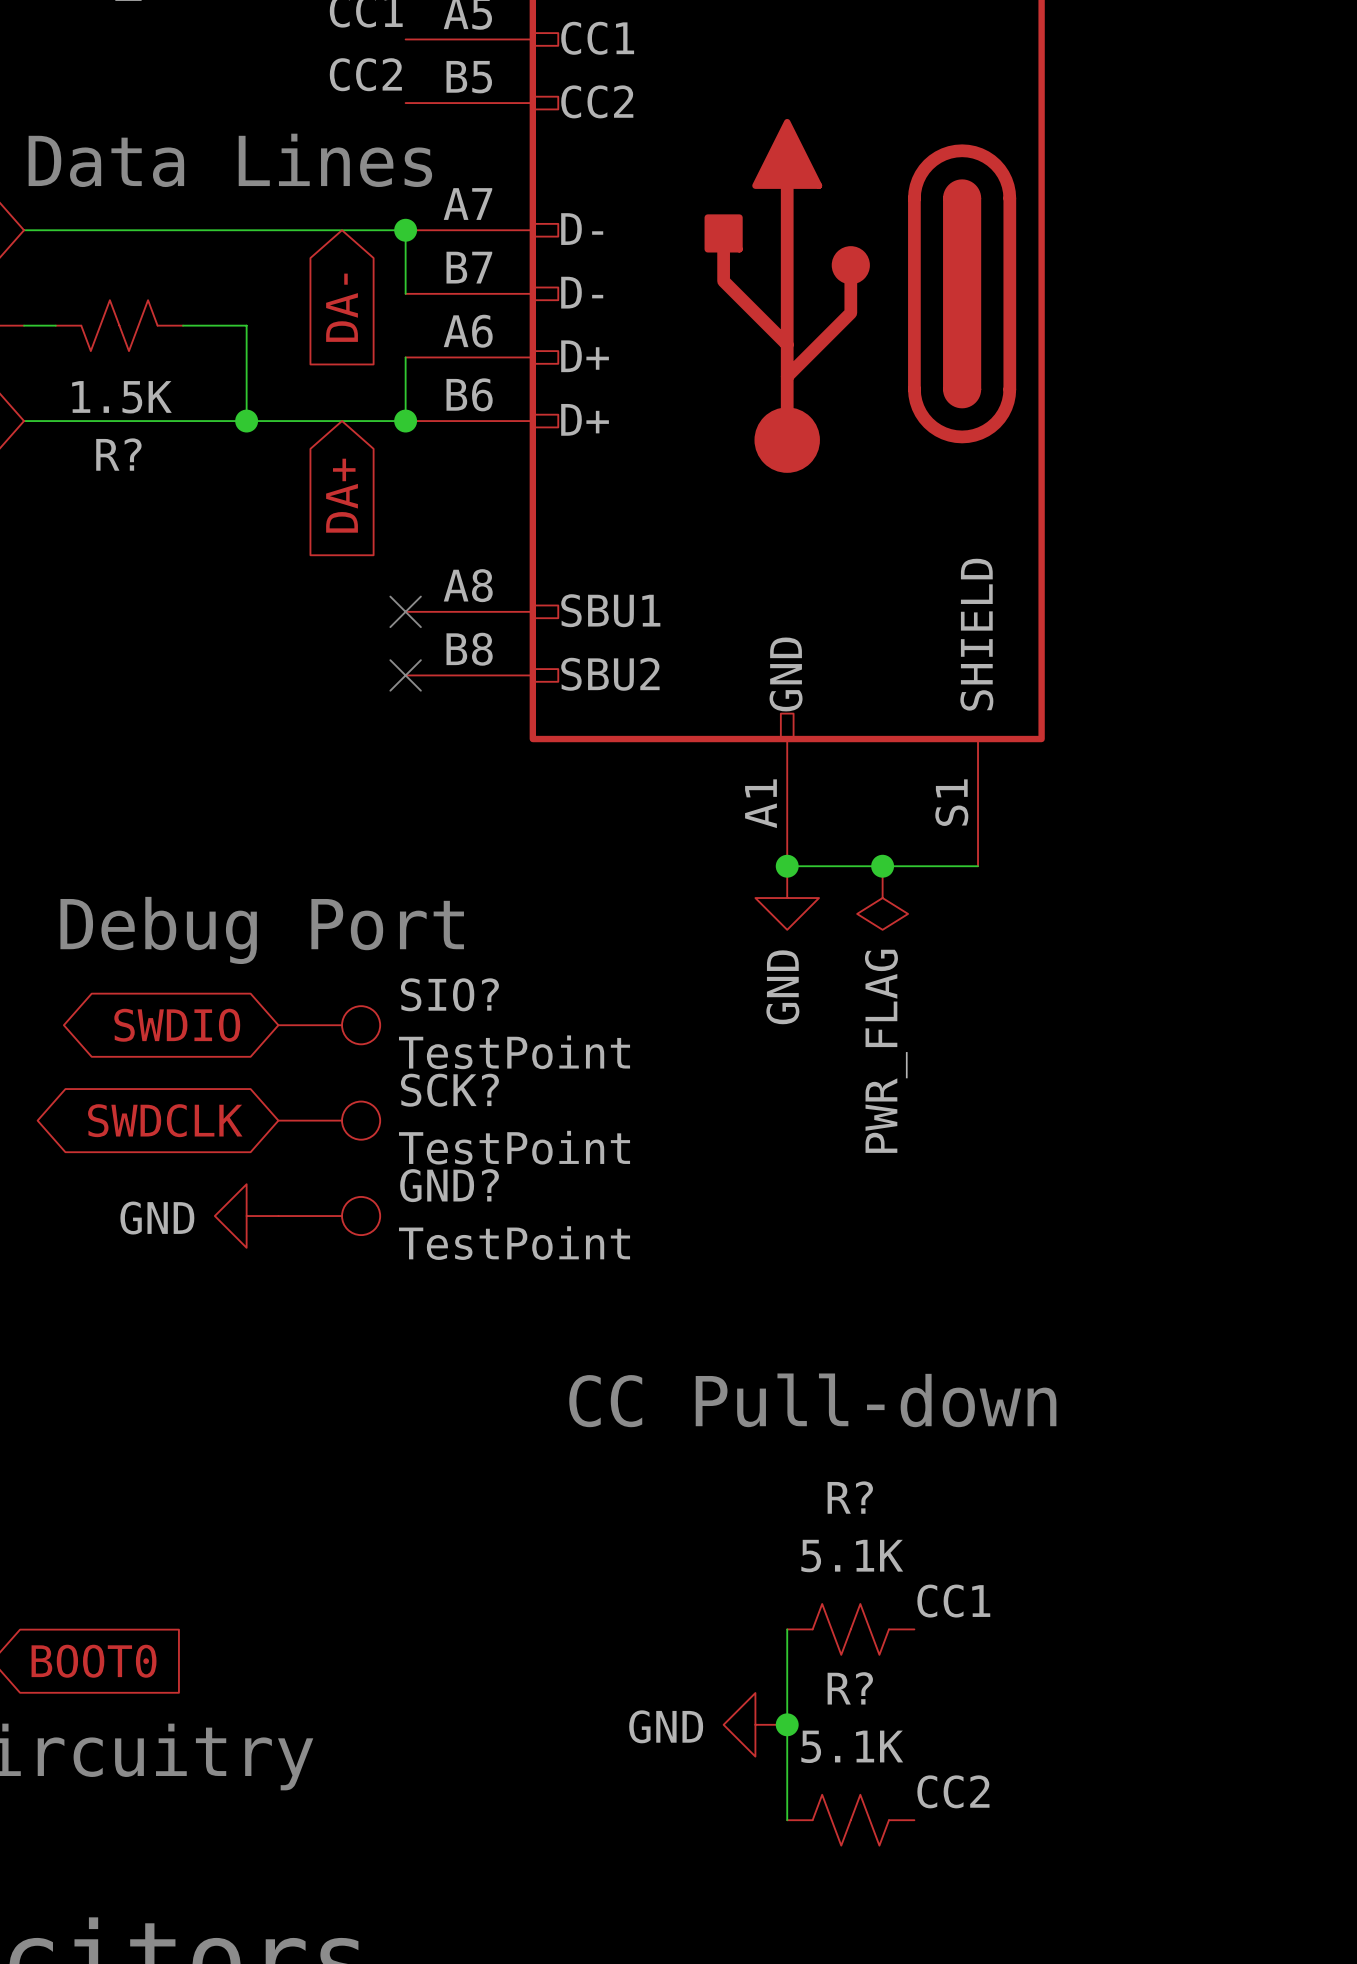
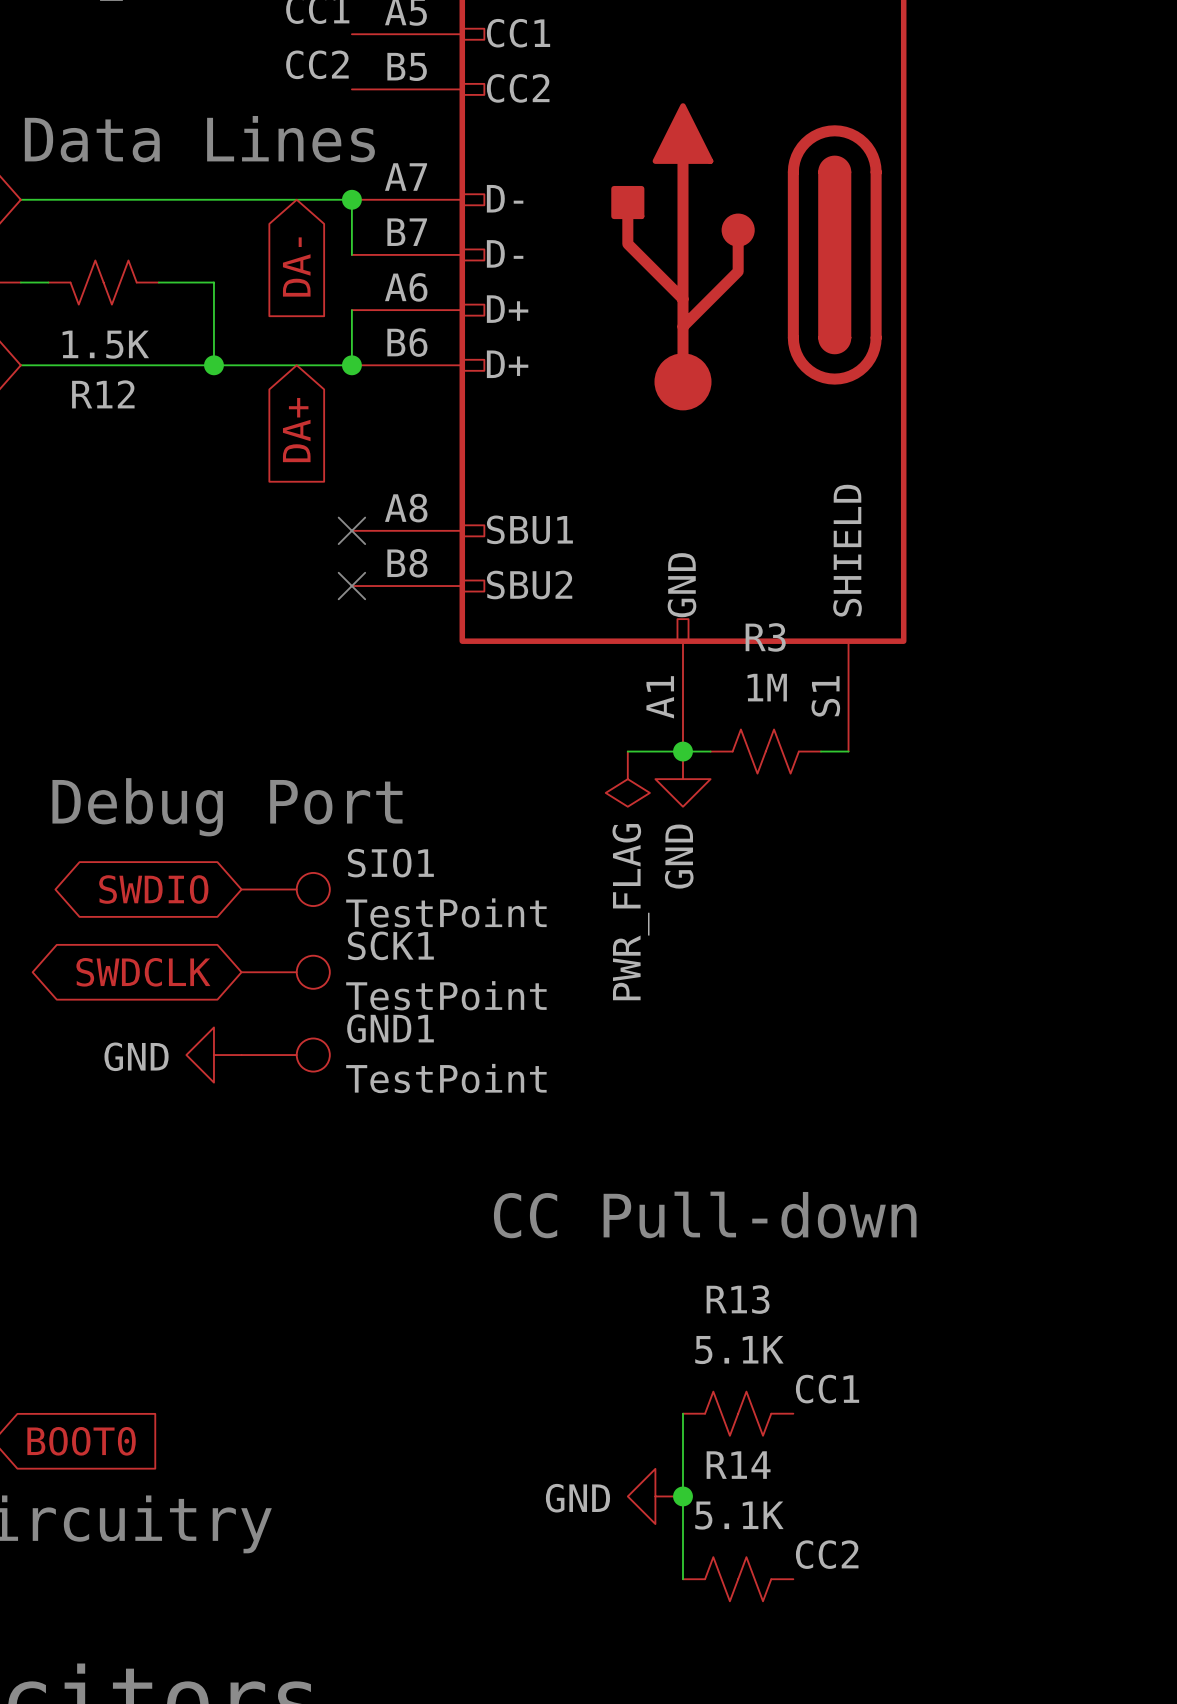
R? name: R? (118, 454) -> R12 (103, 394)
wire: none -> (627, 751) (682, 751)
wire: (819, 866) (946, 866) -> none
R3: none -> 1M (765, 751)
junction: (882, 866) -> none
power symbol position: PWR_FLAG (882, 898) -> PWR_FLAG (627, 779)
SIO? name: SIO? (449, 994) -> SIO1 (390, 863)
SCK? name: SCK? (449, 1090) -> SCK1 (390, 945)
GND? name: GND? (449, 1185) -> GND1 (390, 1028)
R? name: R? (850, 1497) -> R13 (738, 1299)
R? name: R? (850, 1688) -> R14 (738, 1465)

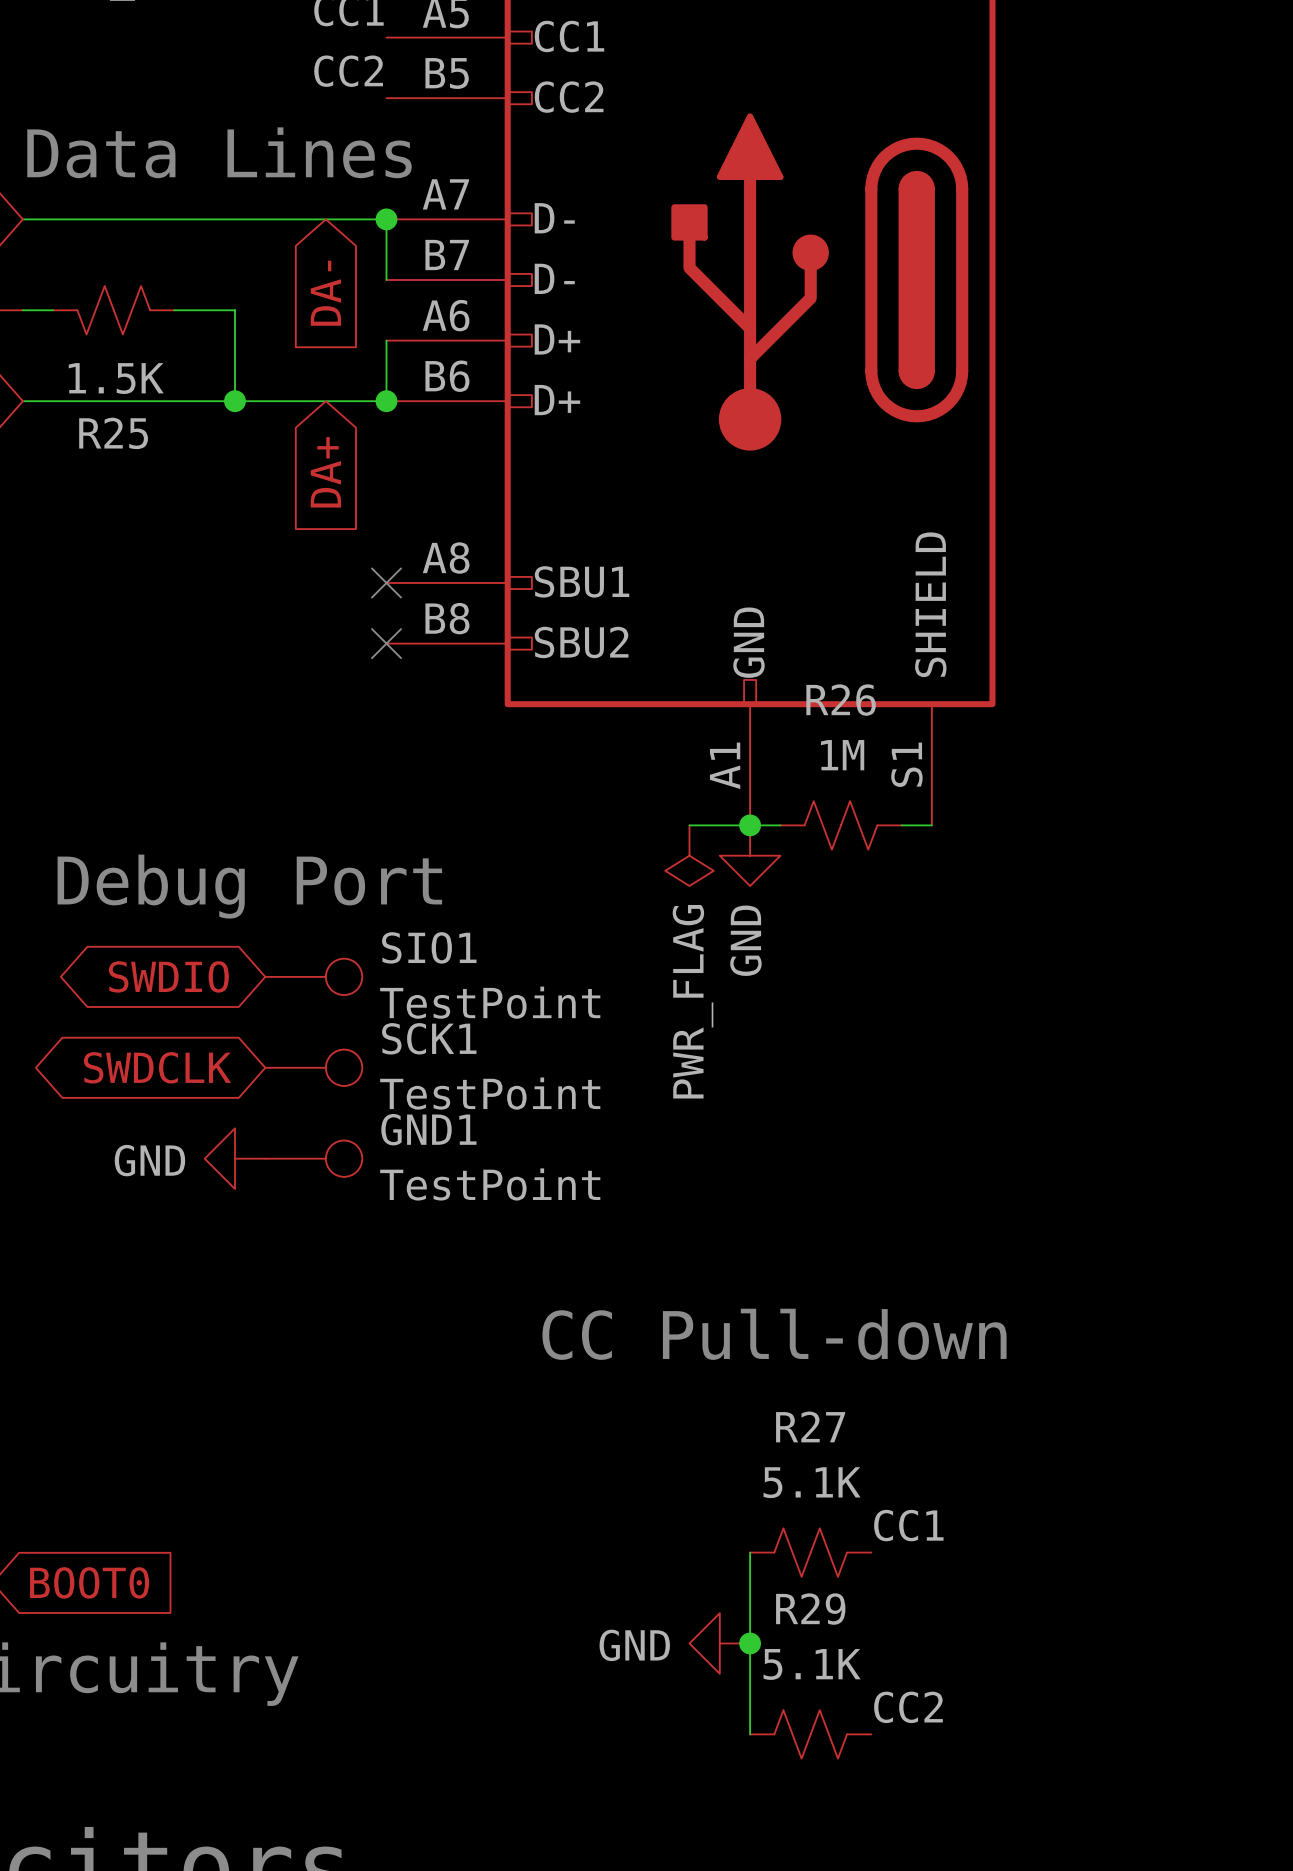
R12 name: R12 (103, 394) -> R25 (113, 433)
R3 name: R3 (765, 637) -> R26 (841, 700)
R13 name: R13 (738, 1299) -> R27 (810, 1426)
R14 name: R14 (738, 1465) -> R29 (810, 1609)

